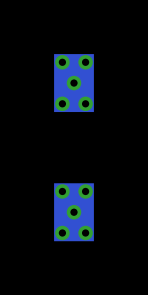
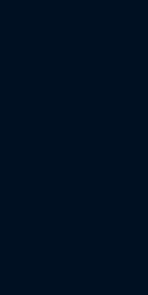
part: (73, 83) -> none
part: (73, 212) -> none

